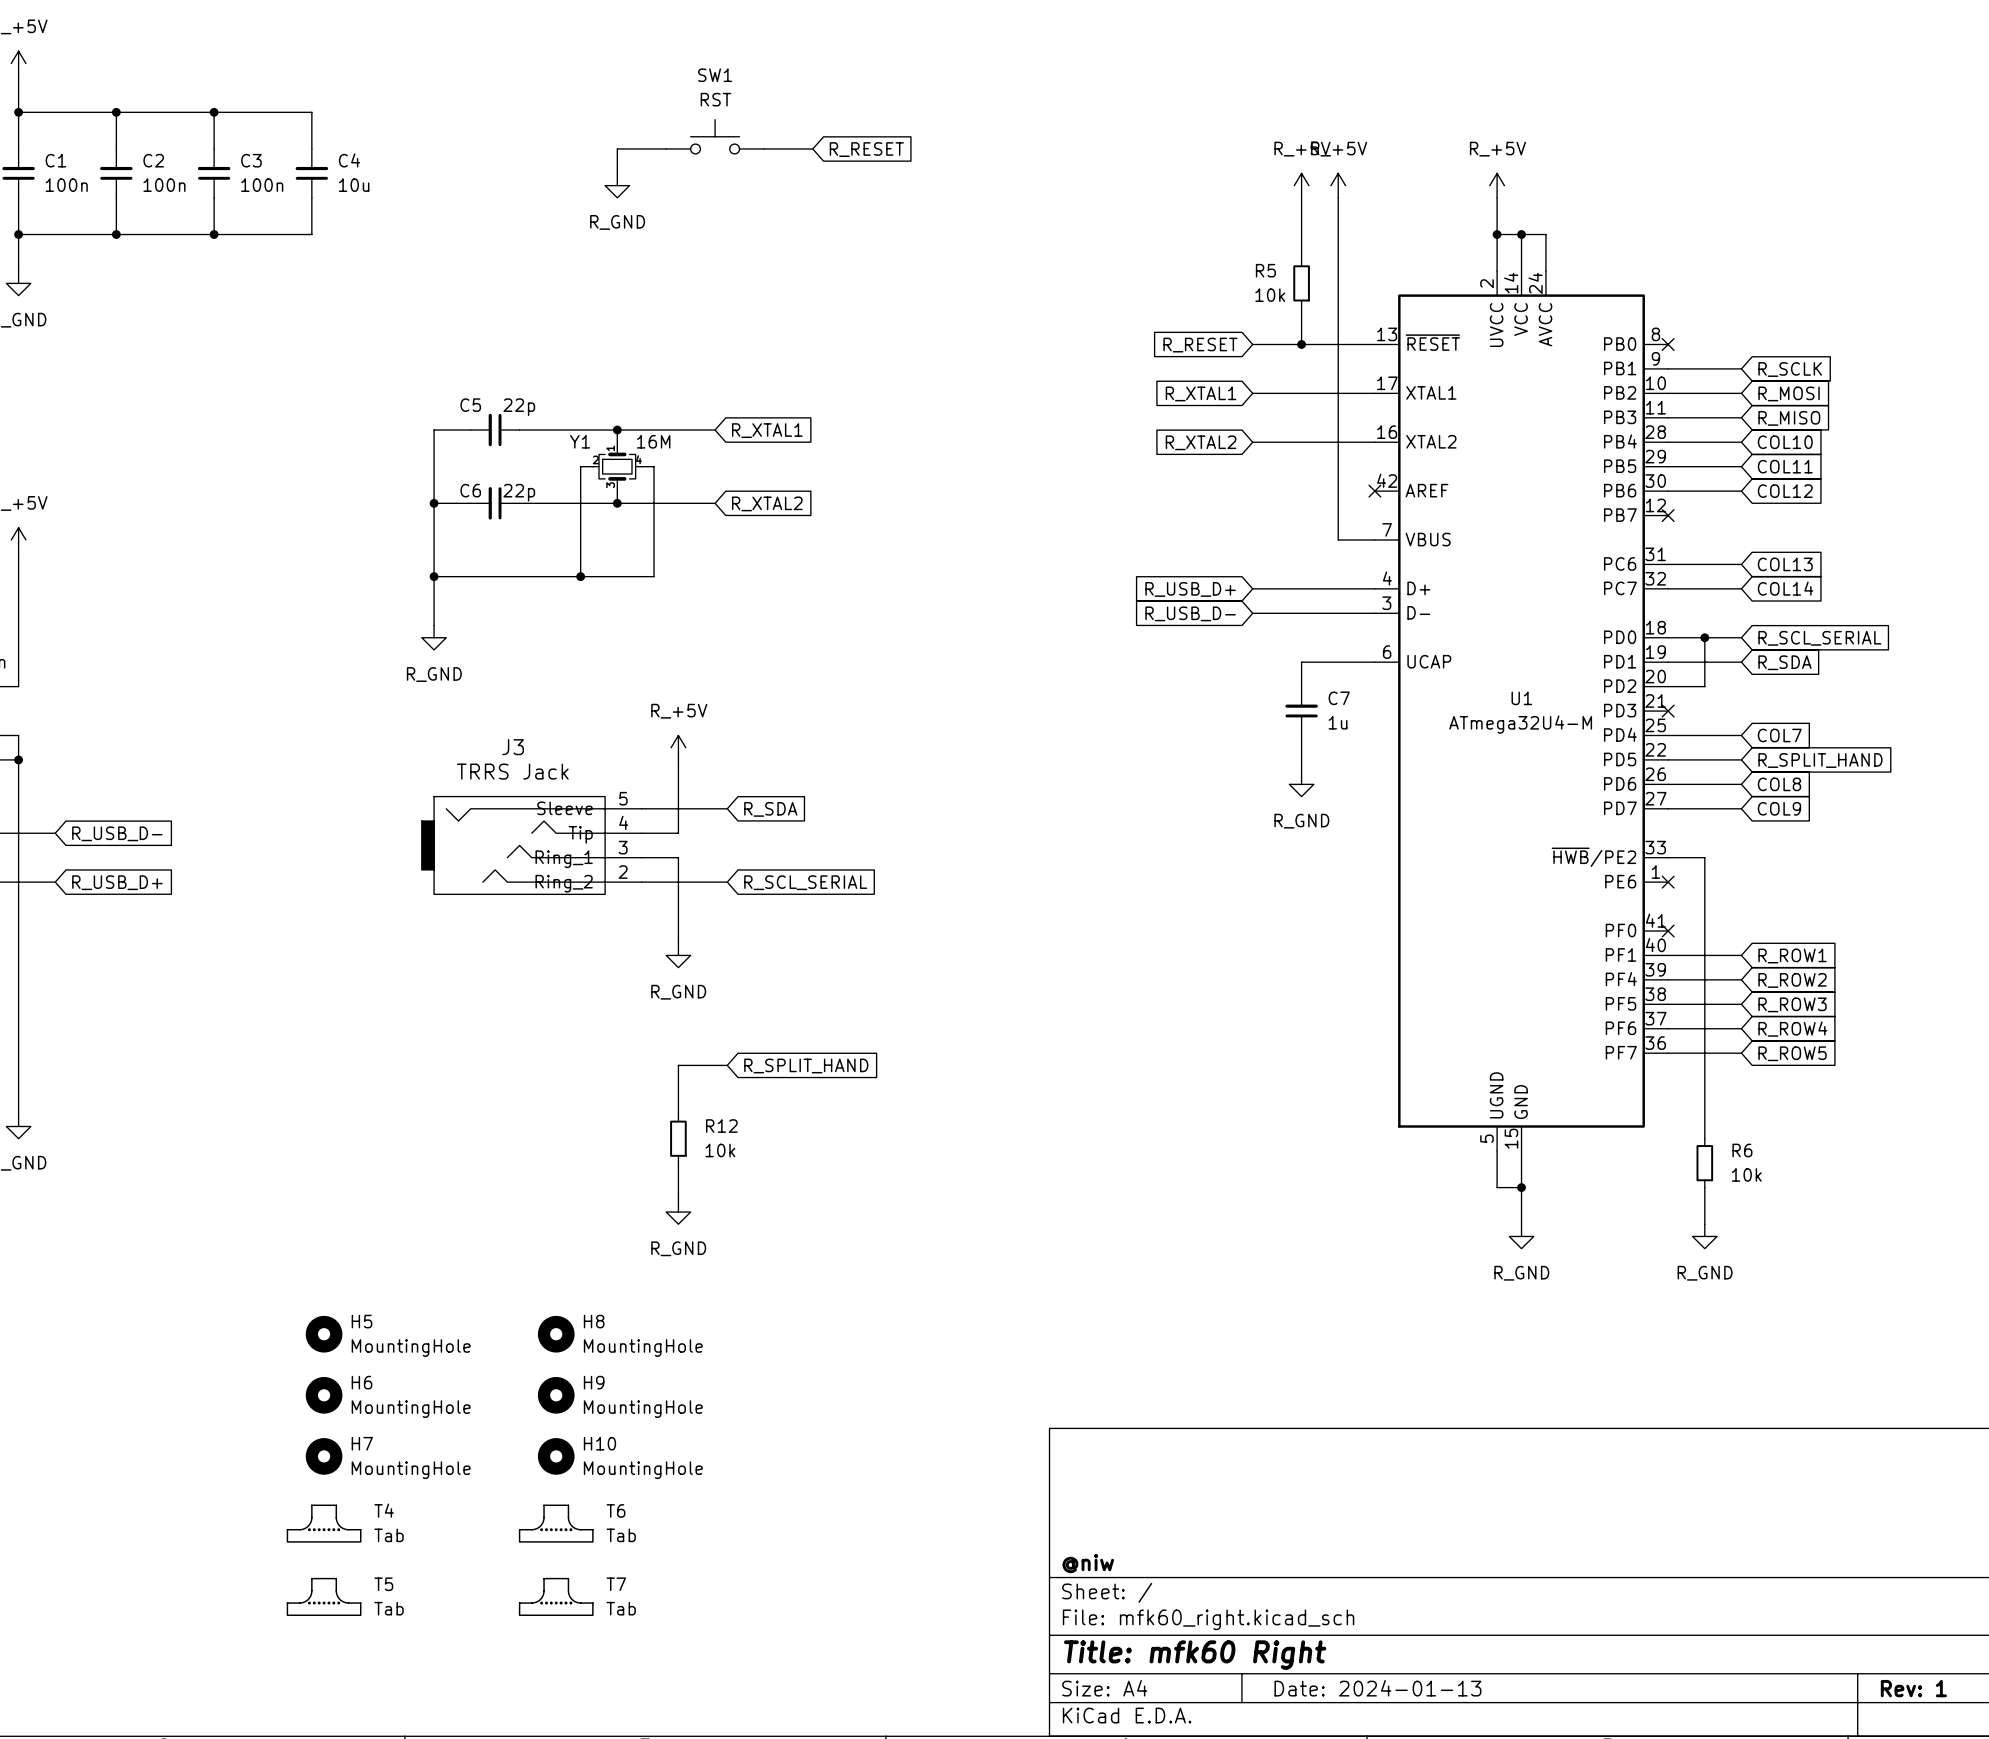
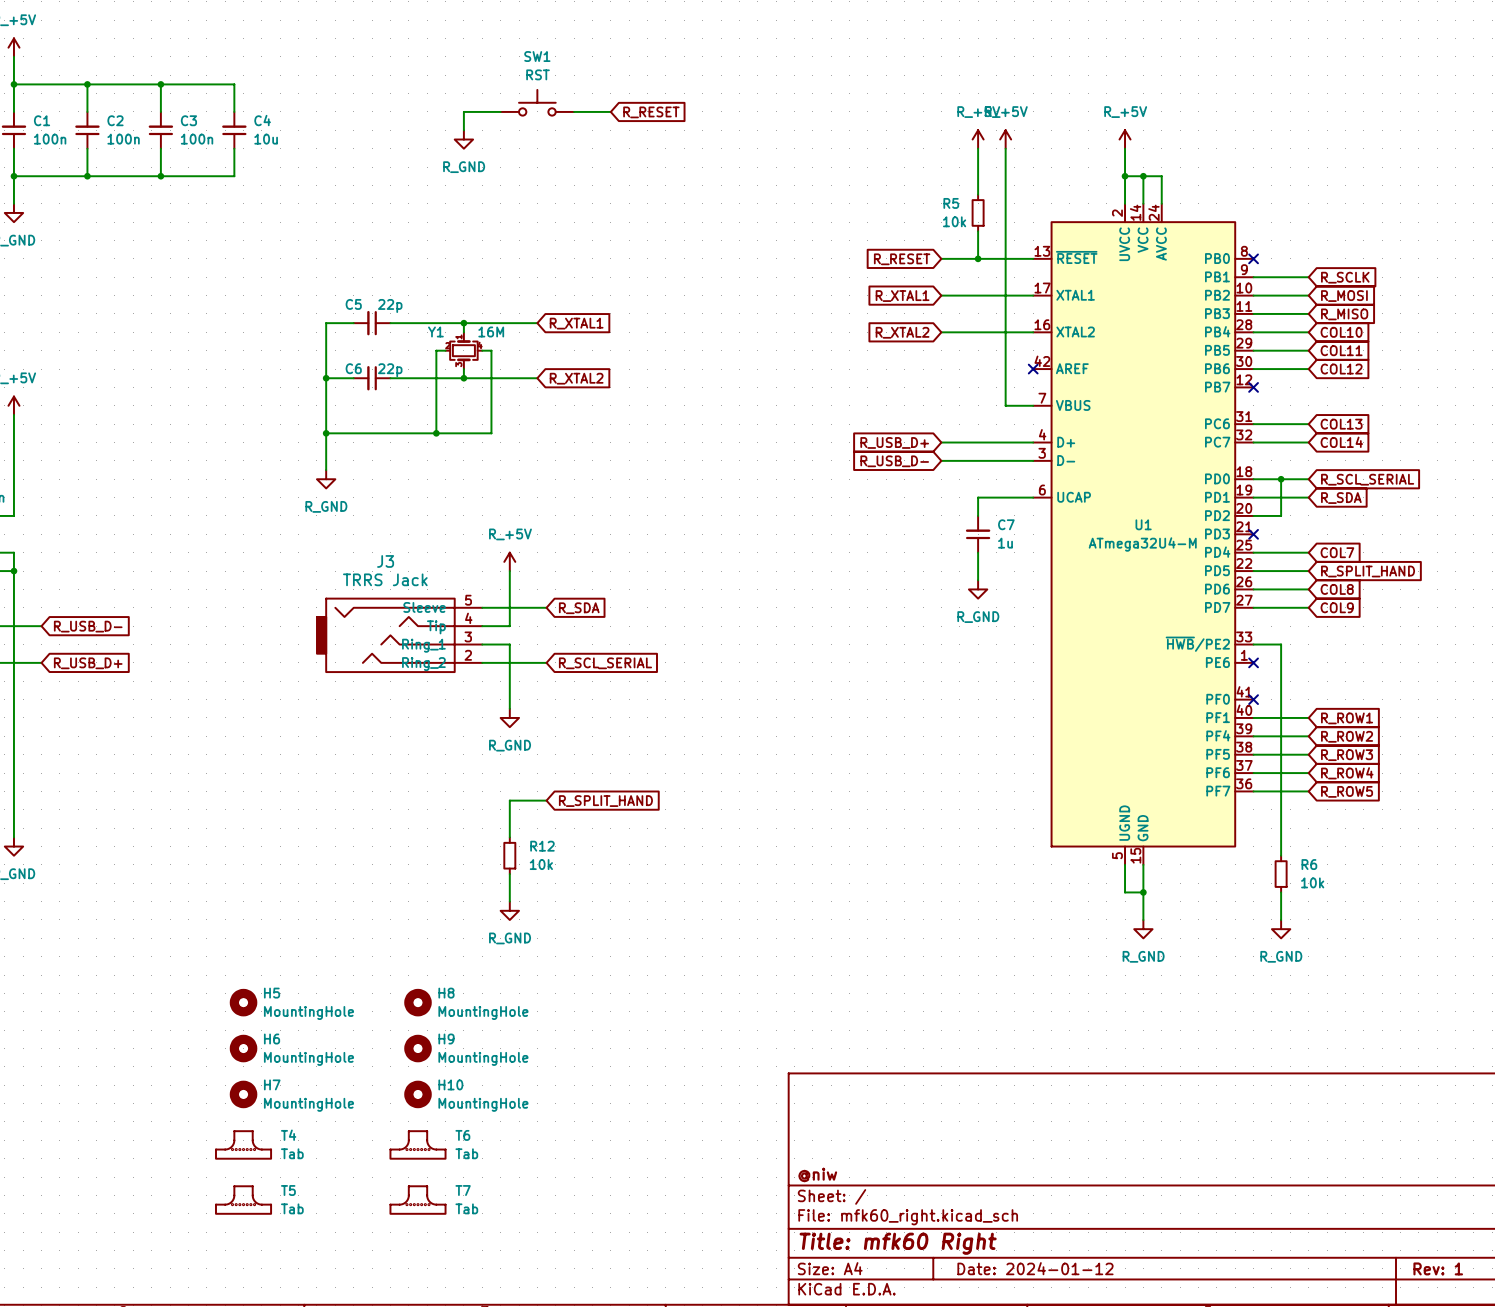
title block: Date: 2024-01-13 (1377, 1688) -> Date: 2024-01-12 (1035, 1268)

